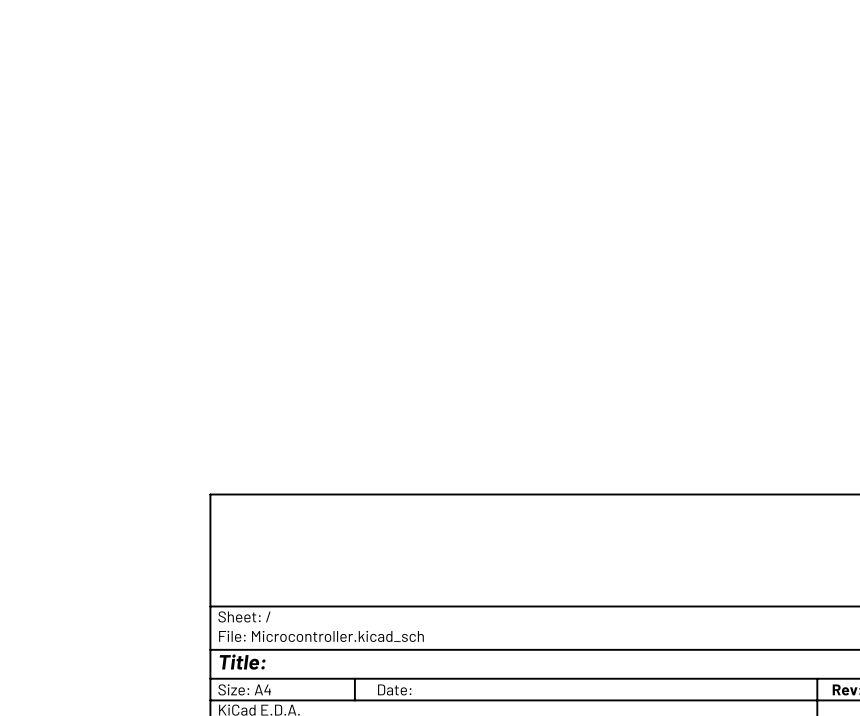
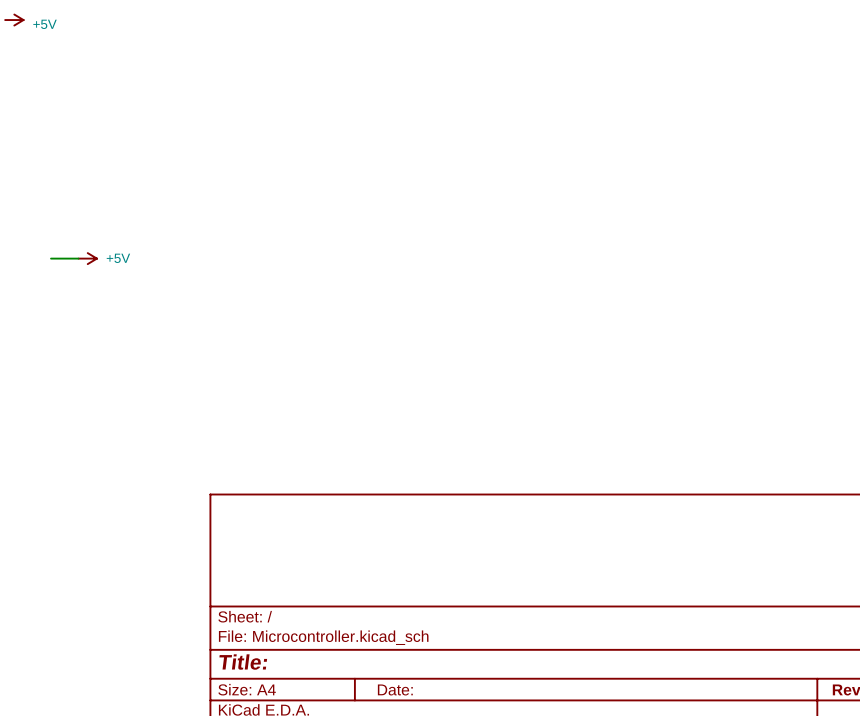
power symbol: none -> +5V (14, 20)
wire: none -> (51, 258) (78, 258)
power symbol: none -> +5V (87, 258)

